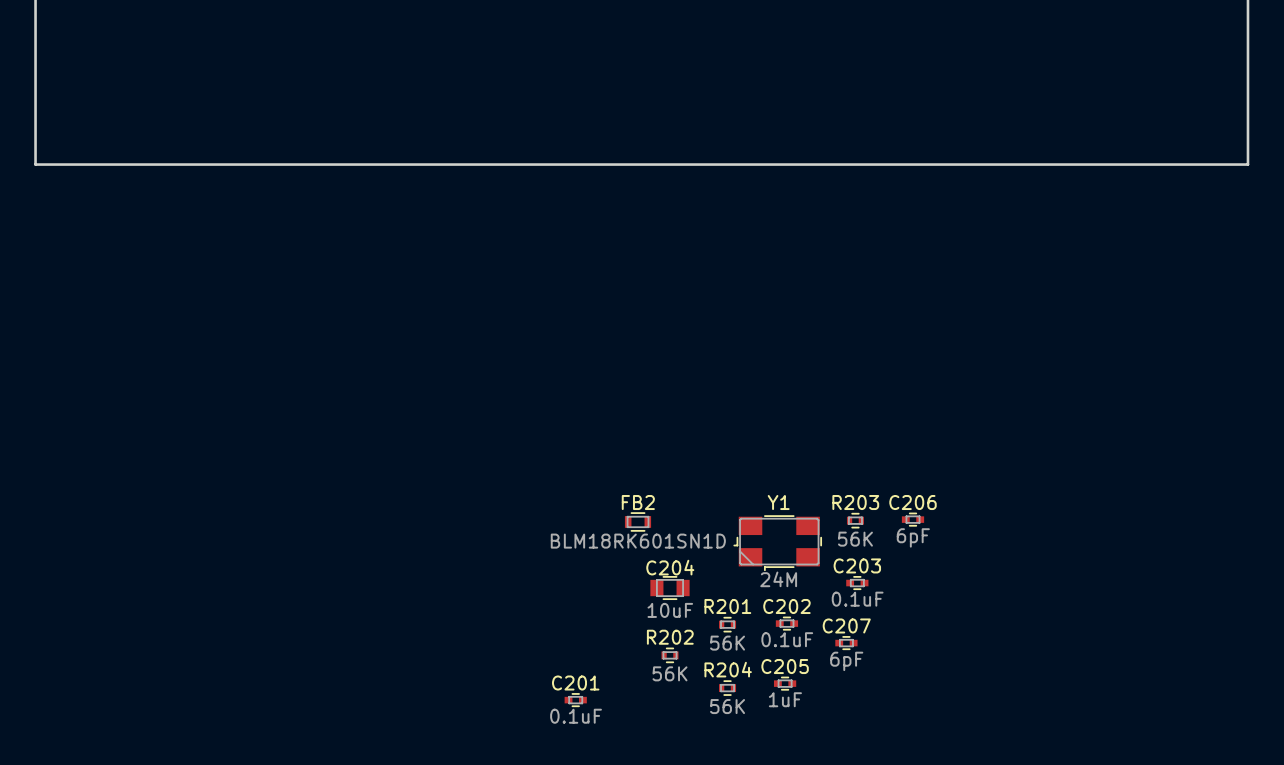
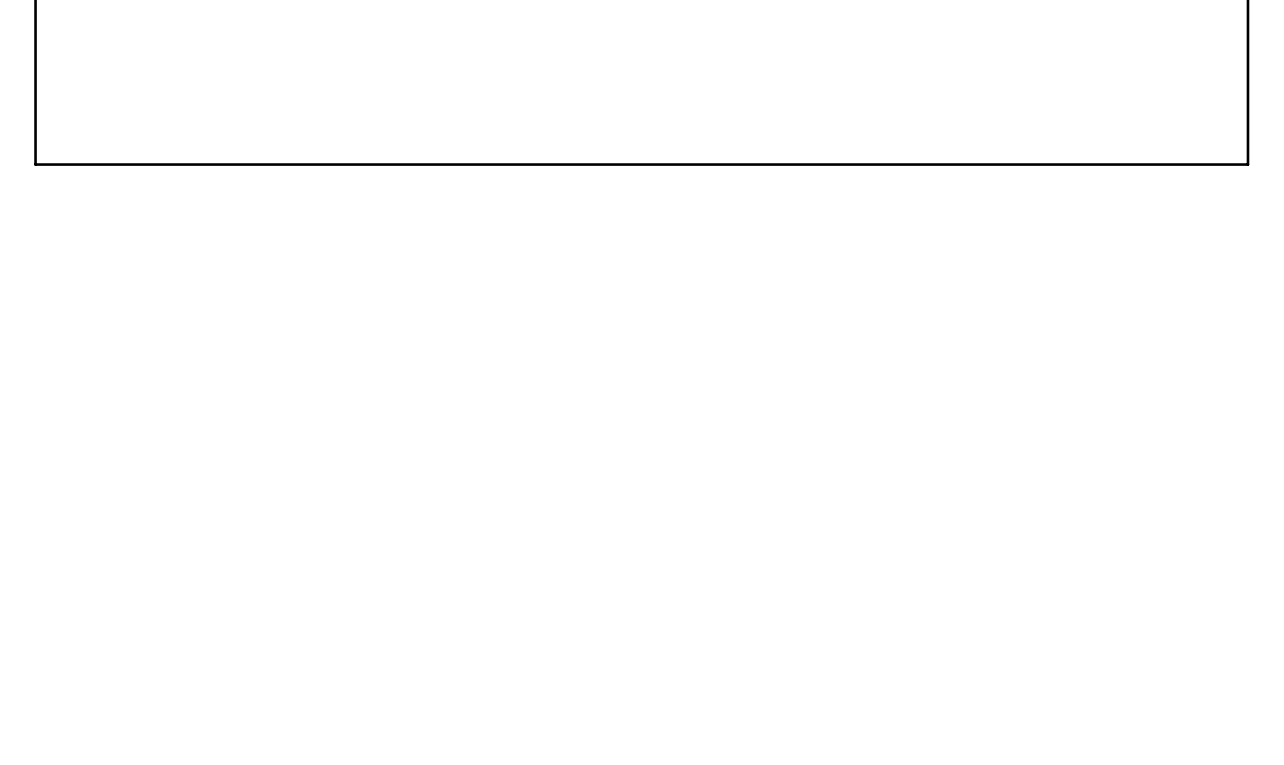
C206: 6pF (913, 519) -> none
R203: 56K (855, 520) -> none
FB2: BLM18RK601SN1D (638, 521) -> none
Y1: 24M (777, 543) -> none
C203: 0.1uF (857, 583) -> none
C204: 10uF (669, 588) -> none
C202: 0.1uF (786, 623) -> none
R201: 56K (727, 624) -> none
C207: 6pF (846, 643) -> none
R202: 56K (669, 655) -> none
C205: 1uF (785, 683) -> none
R204: 56K (727, 688) -> none
C201: 0.1uF (575, 700) -> none

